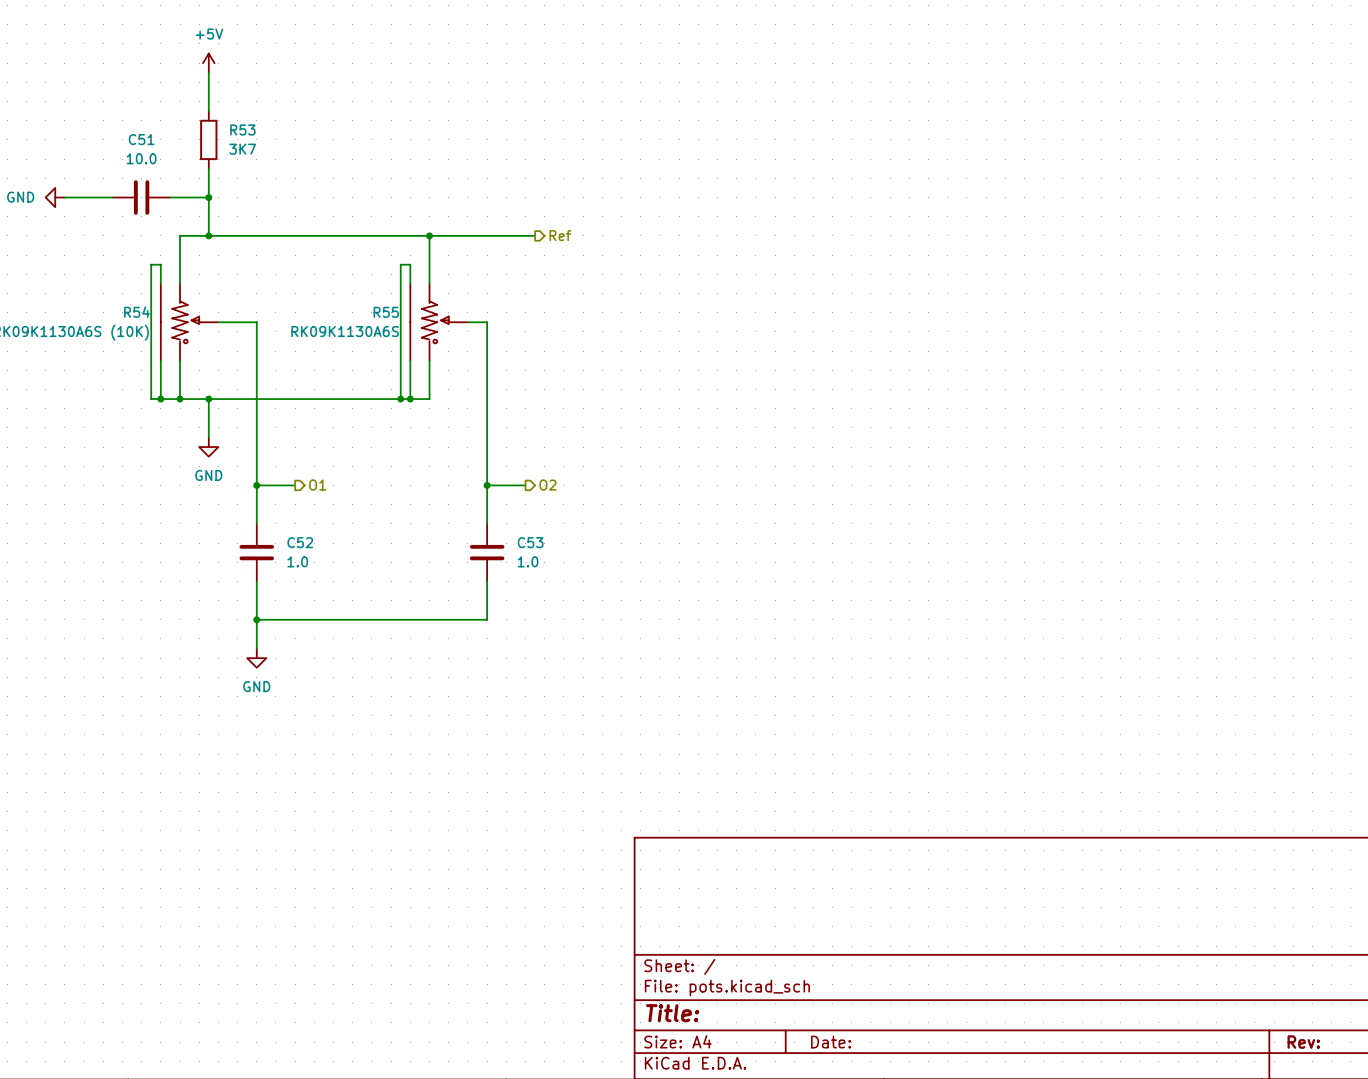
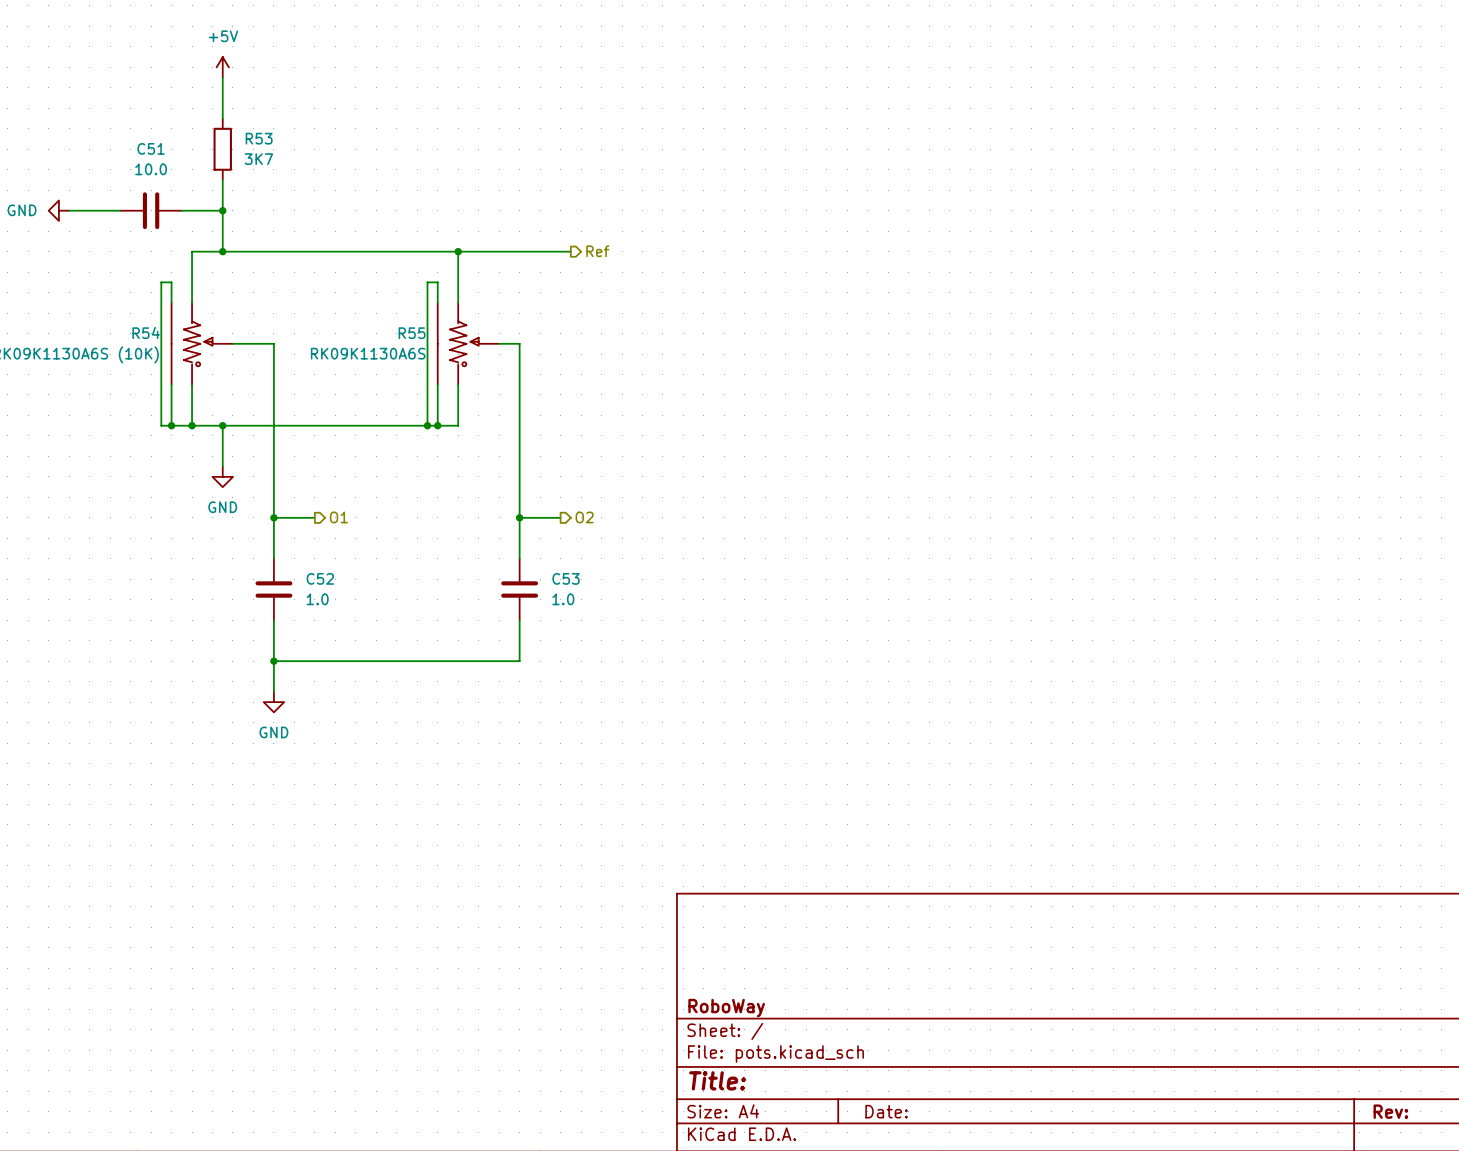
title block: none -> RoboWay (726, 1008)

